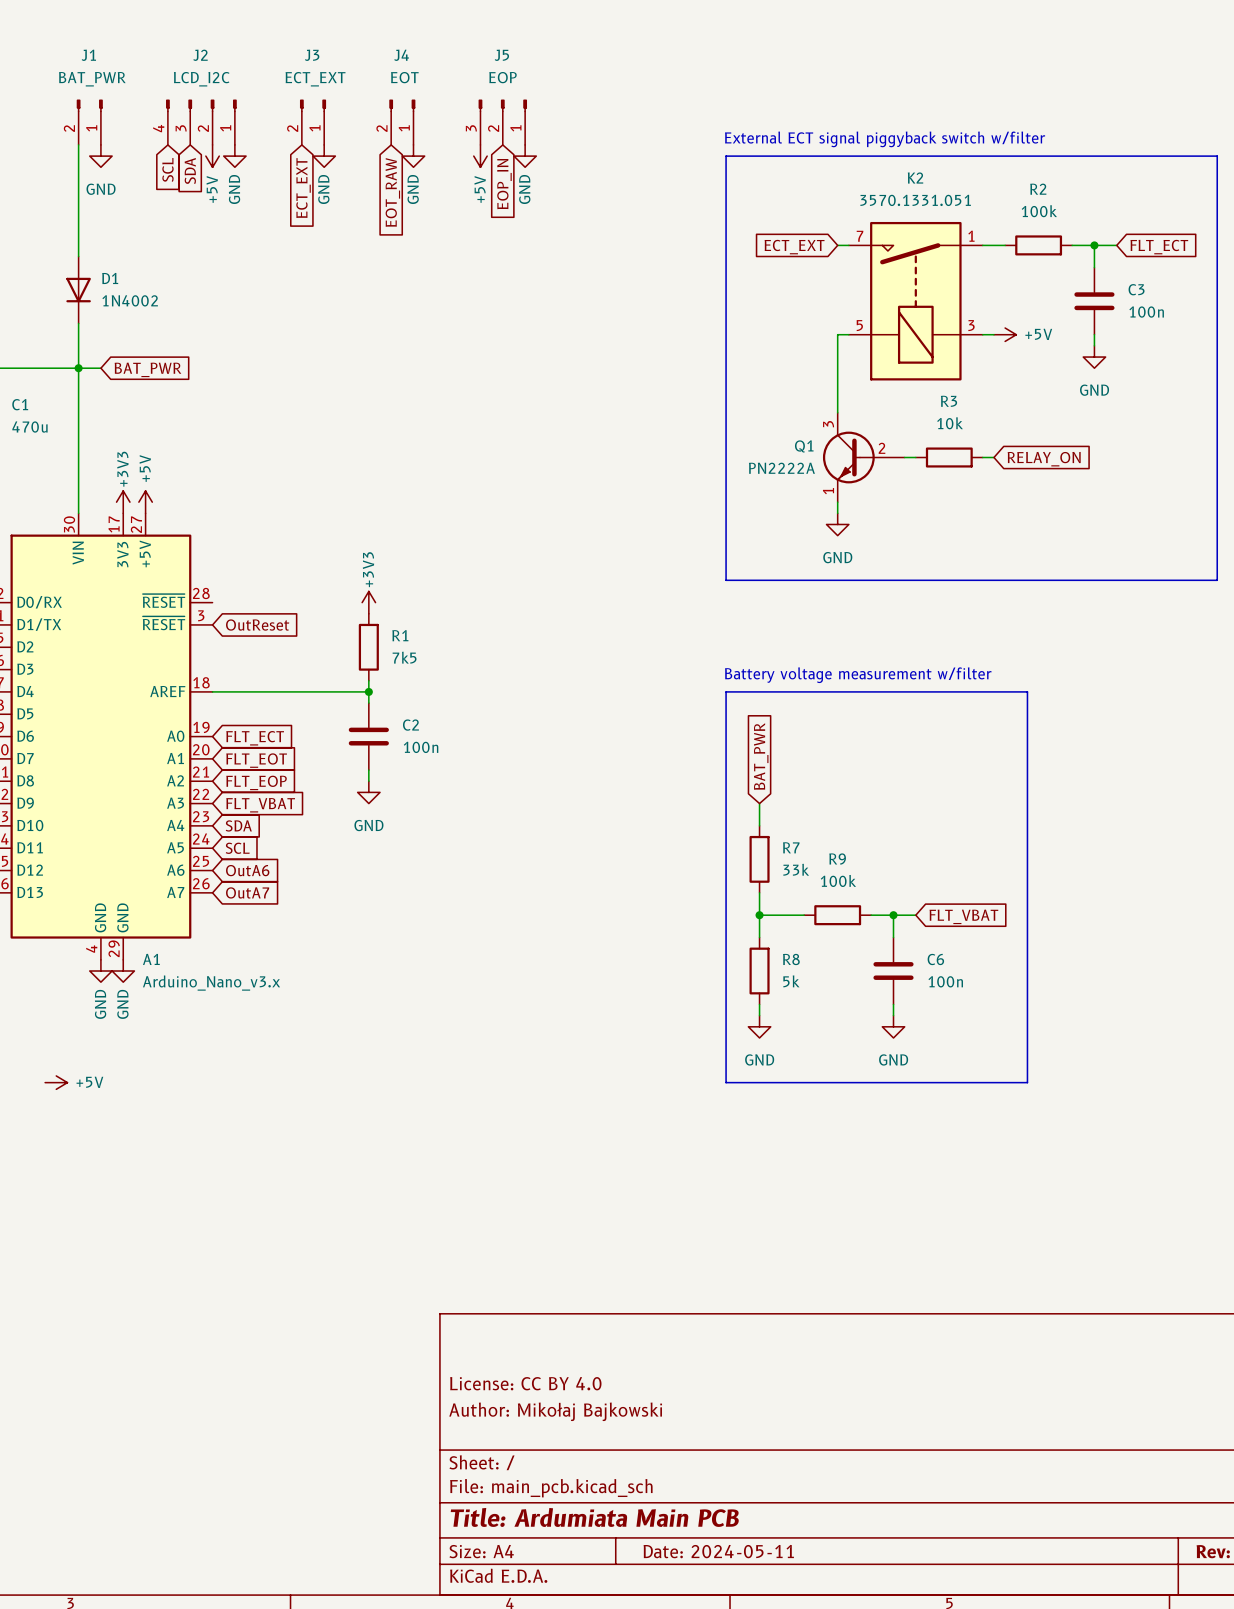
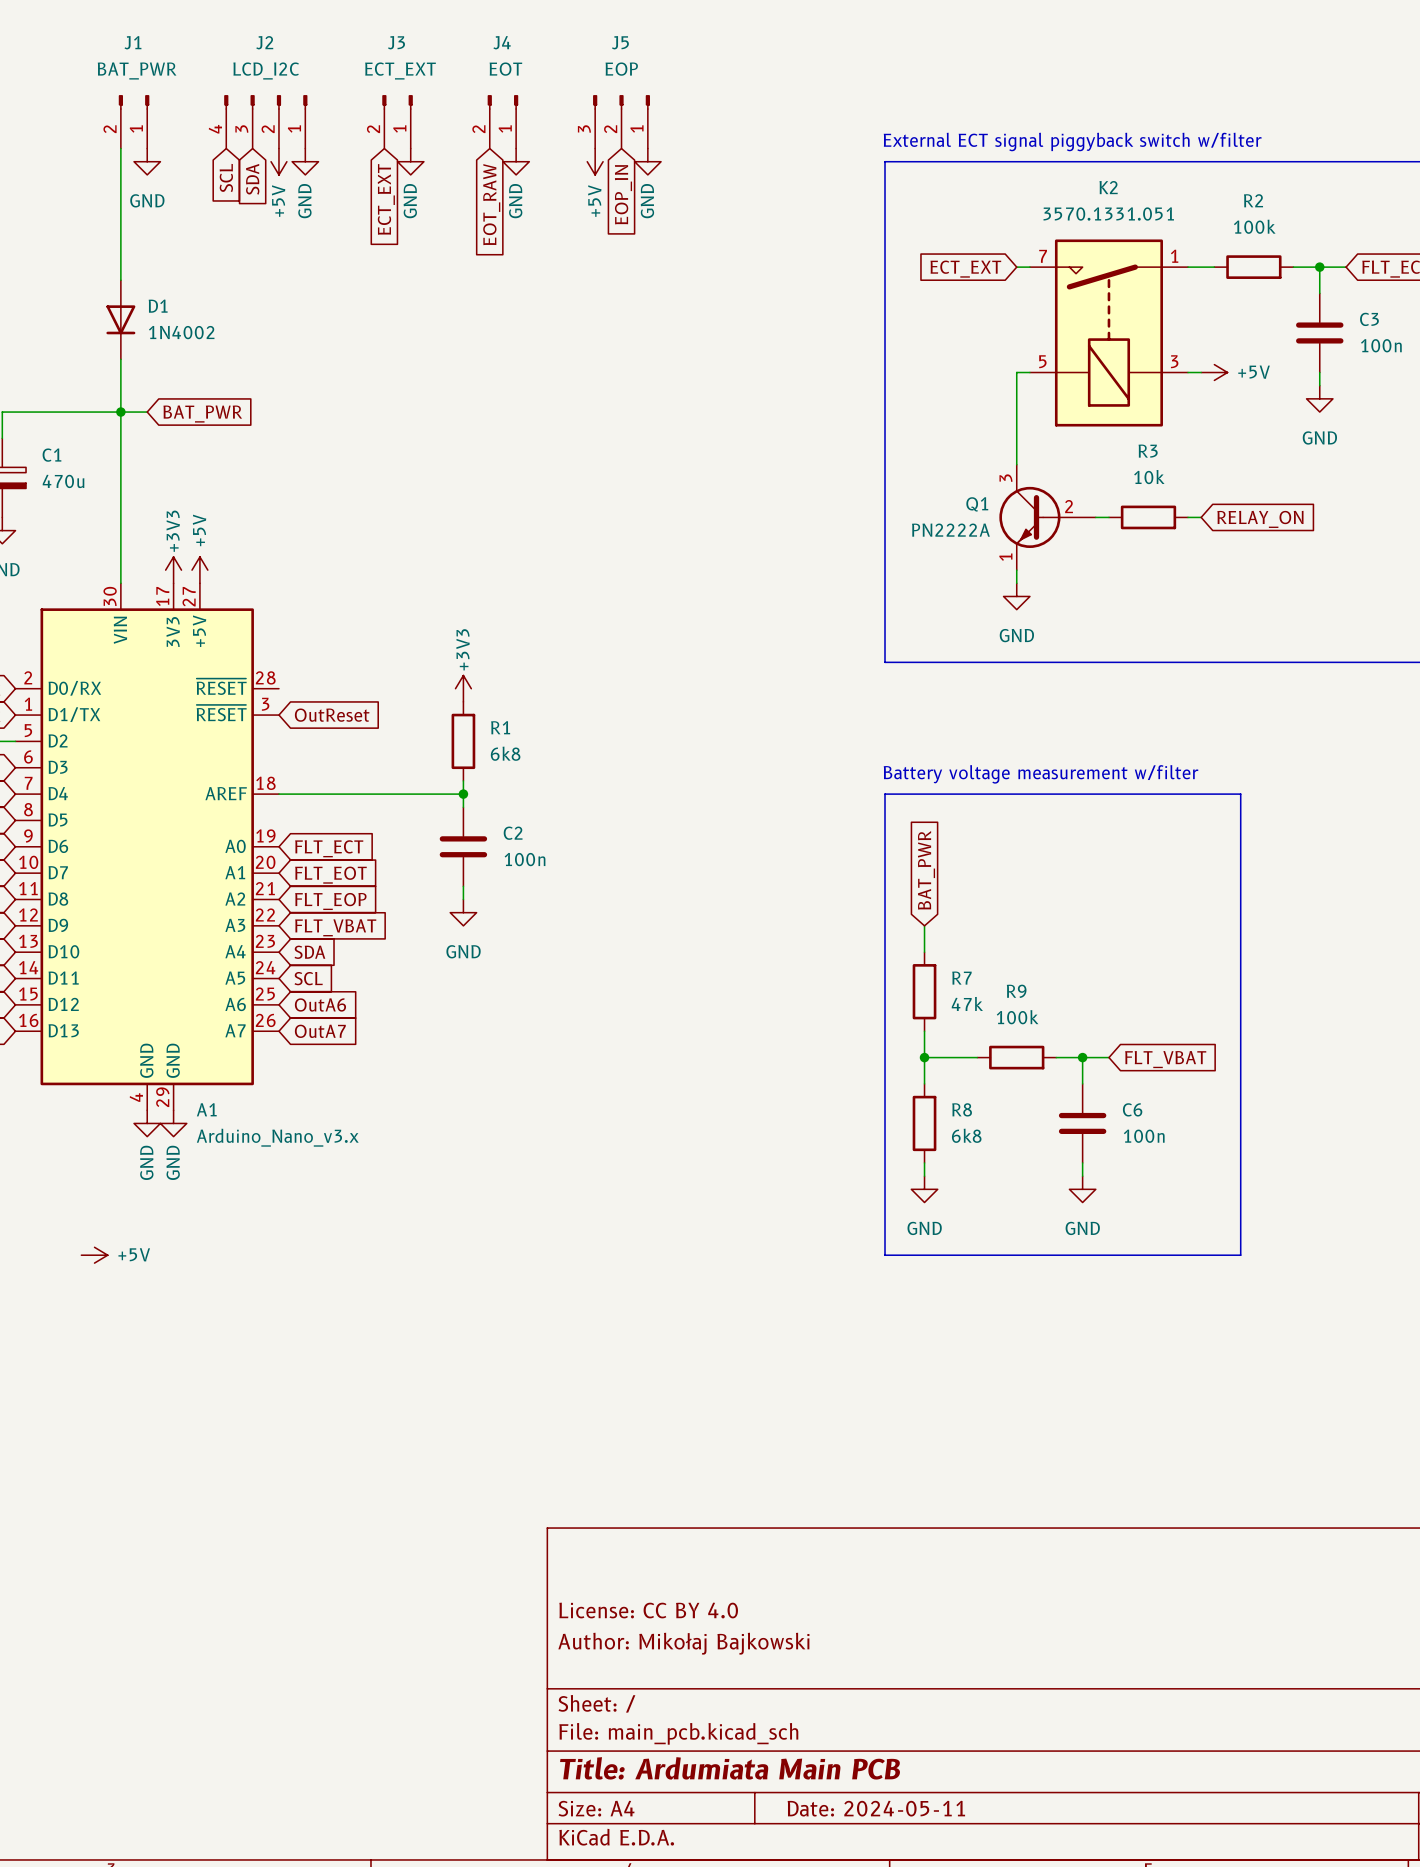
R1 value: 7k5 (404, 657) -> 6k8 (505, 753)
R7 value: 33k (796, 869) -> 47k (967, 1003)
R8 value: 5k (791, 981) -> 6k8 (966, 1135)

